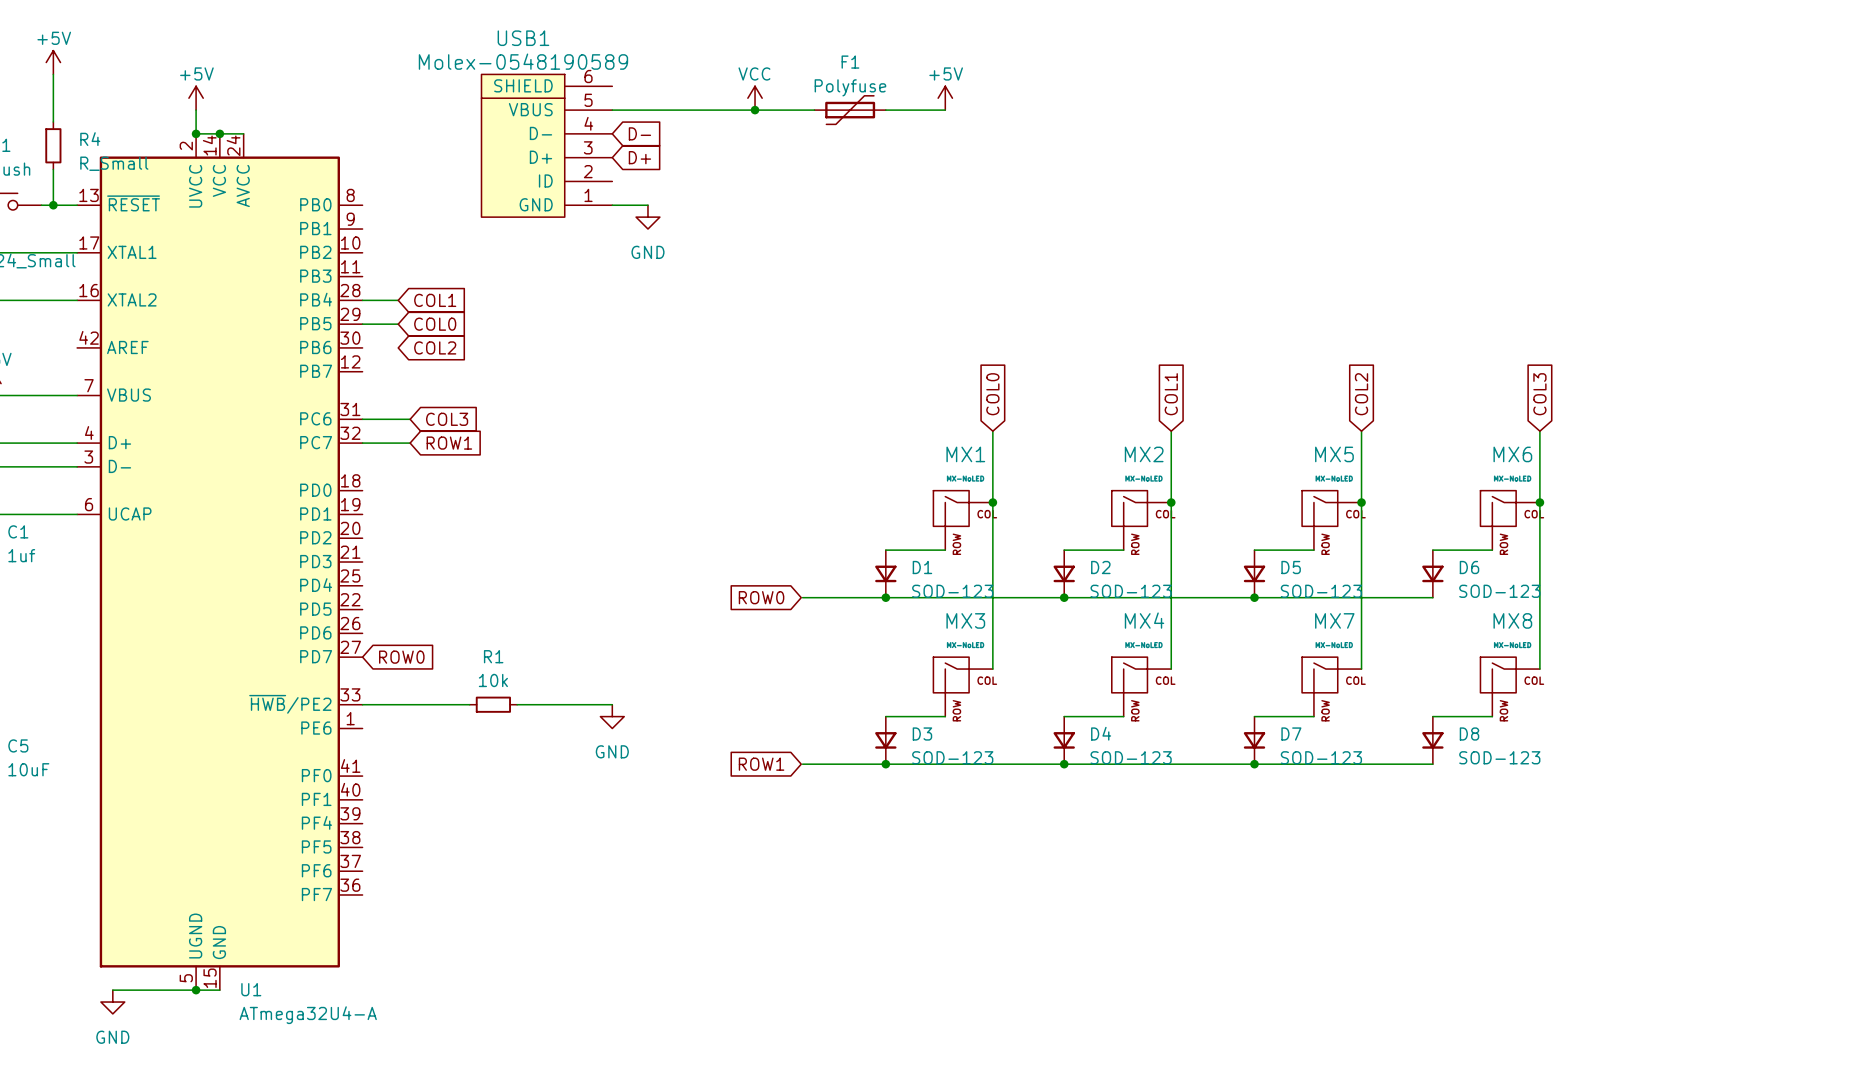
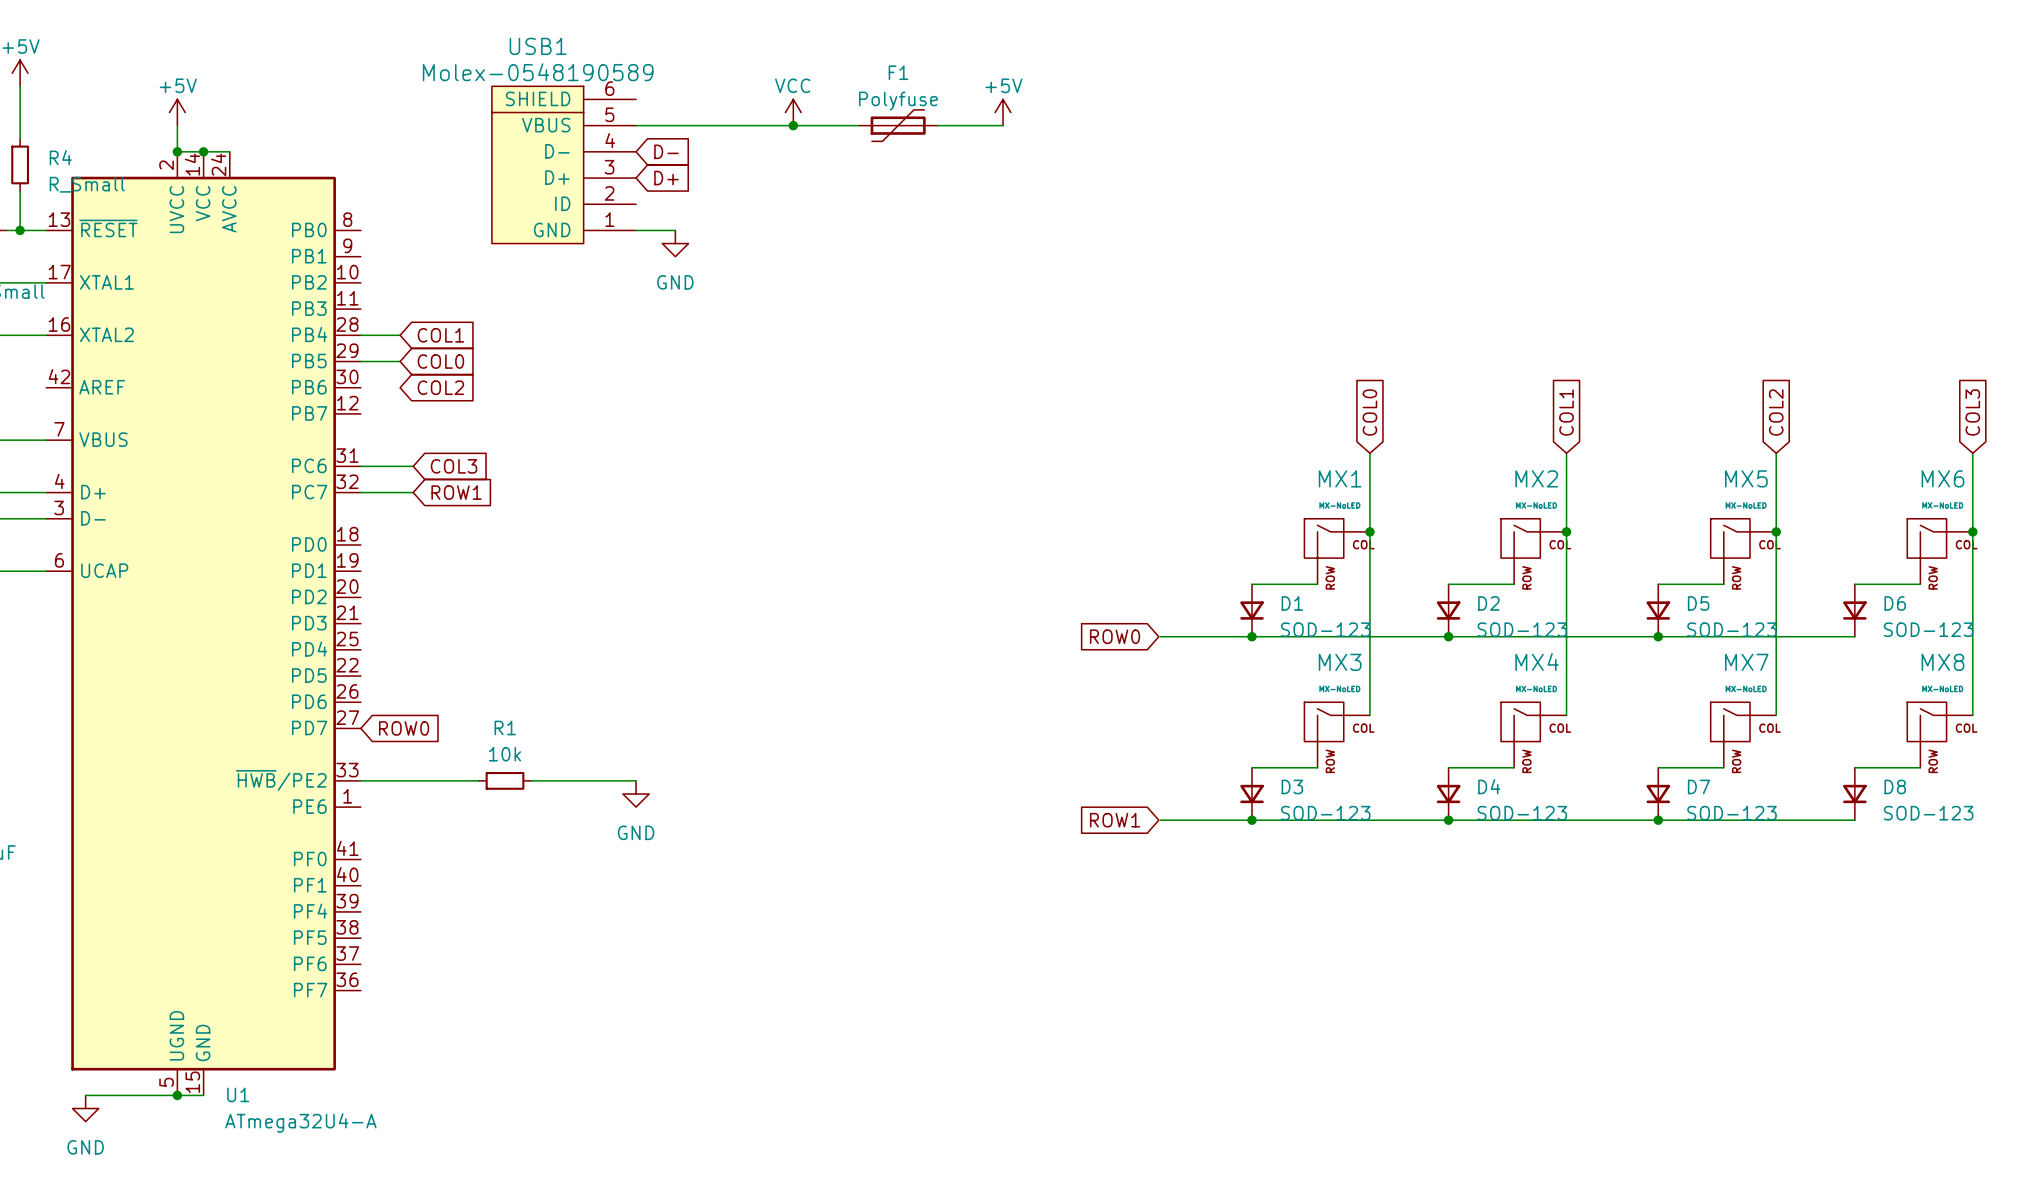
global label: none -> COL0 (1369, 412)
global label: none -> COL1 (1566, 412)
global label: none -> COL2 (1776, 412)
global label: none -> COL3 (1972, 412)
global label: COL0 (992, 394) -> none
global label: COL1 (1171, 394) -> none
global label: COL2 (1361, 394) -> none
global label: COL3 (1539, 394) -> none
wire: none -> (1776, 453) (1776, 715)
wire: none -> (1972, 453) (1972, 715)
wire: (992, 431) (992, 669) -> none
wire: (1171, 431) (1171, 669) -> none
wire: (1361, 431) (1361, 669) -> (1369, 453) (1369, 715)
wire: (1539, 431) (1539, 669) -> (1566, 453) (1566, 715)
junction: none -> (1369, 531)
junction: none -> (1566, 531)
junction: none -> (1776, 531)
junction: none -> (1972, 531)
junction: (992, 502) -> none
junction: (1171, 502) -> none
junction: (1361, 502) -> none
junction: (1539, 502) -> none
MX1 position: (963, 520) -> (1337, 551)
MX2 position: (1141, 520) -> (1533, 551)
MX5 position: (1331, 520) -> (1743, 551)
MX6 position: (1510, 520) -> (1940, 551)
wire: none -> (1658, 584) (1723, 584)
wire: none -> (1854, 584) (1920, 584)
wire: (885, 550) (945, 550) -> none
wire: (1064, 550) (1123, 550) -> none
wire: (1254, 550) (1313, 550) -> (1252, 584) (1317, 584)
wire: (1432, 550) (1492, 550) -> (1448, 584) (1514, 584)
D1 position: (885, 573) -> (1252, 610)
global label: none -> ROW0 (1115, 636)
D2 position: (1064, 573) -> (1448, 610)
wire: none -> (1160, 636) (1854, 636)
junction: none -> (1252, 636)
D5 position: (1254, 573) -> (1658, 610)
junction: none -> (1448, 636)
D6 position: (1432, 573) -> (1854, 610)
junction: none -> (1658, 636)
global label: ROW0 (761, 597) -> none
wire: (802, 597) (1432, 597) -> none
junction: (885, 597) -> none
junction: (1064, 597) -> none
junction: (1254, 597) -> none
MX3 position: (963, 686) -> (1337, 735)
MX4 position: (1141, 686) -> (1533, 735)
MX7 position: (1331, 686) -> (1743, 735)
MX8 position: (1510, 686) -> (1940, 735)
wire: none -> (1658, 767) (1723, 767)
wire: none -> (1854, 767) (1920, 767)
wire: (885, 716) (945, 716) -> none
wire: (1064, 716) (1123, 716) -> none
wire: (1254, 716) (1313, 716) -> (1252, 767) (1317, 767)
wire: (1432, 716) (1492, 716) -> (1448, 767) (1514, 767)
D3 position: (885, 740) -> (1252, 793)
global label: none -> ROW1 (1115, 820)
D4 position: (1064, 740) -> (1448, 793)
wire: none -> (1160, 820) (1854, 820)
junction: none -> (1252, 820)
D7 position: (1254, 740) -> (1658, 793)
junction: none -> (1448, 820)
D8 position: (1432, 740) -> (1854, 793)
junction: none -> (1658, 820)
global label: ROW1 (761, 764) -> none
wire: (802, 764) (1432, 764) -> none
junction: (885, 764) -> none
junction: (1064, 764) -> none
junction: (1254, 764) -> none

